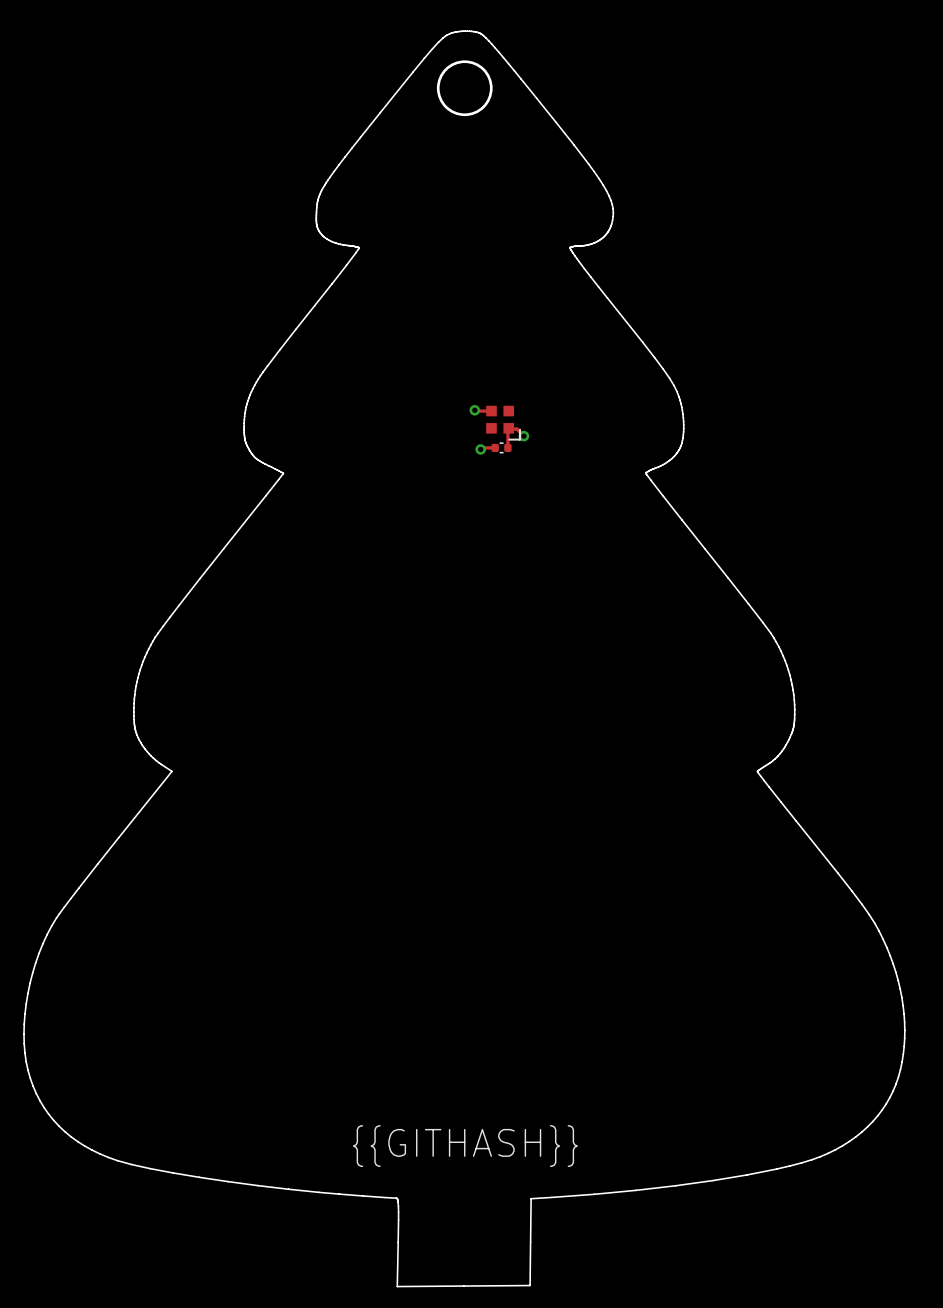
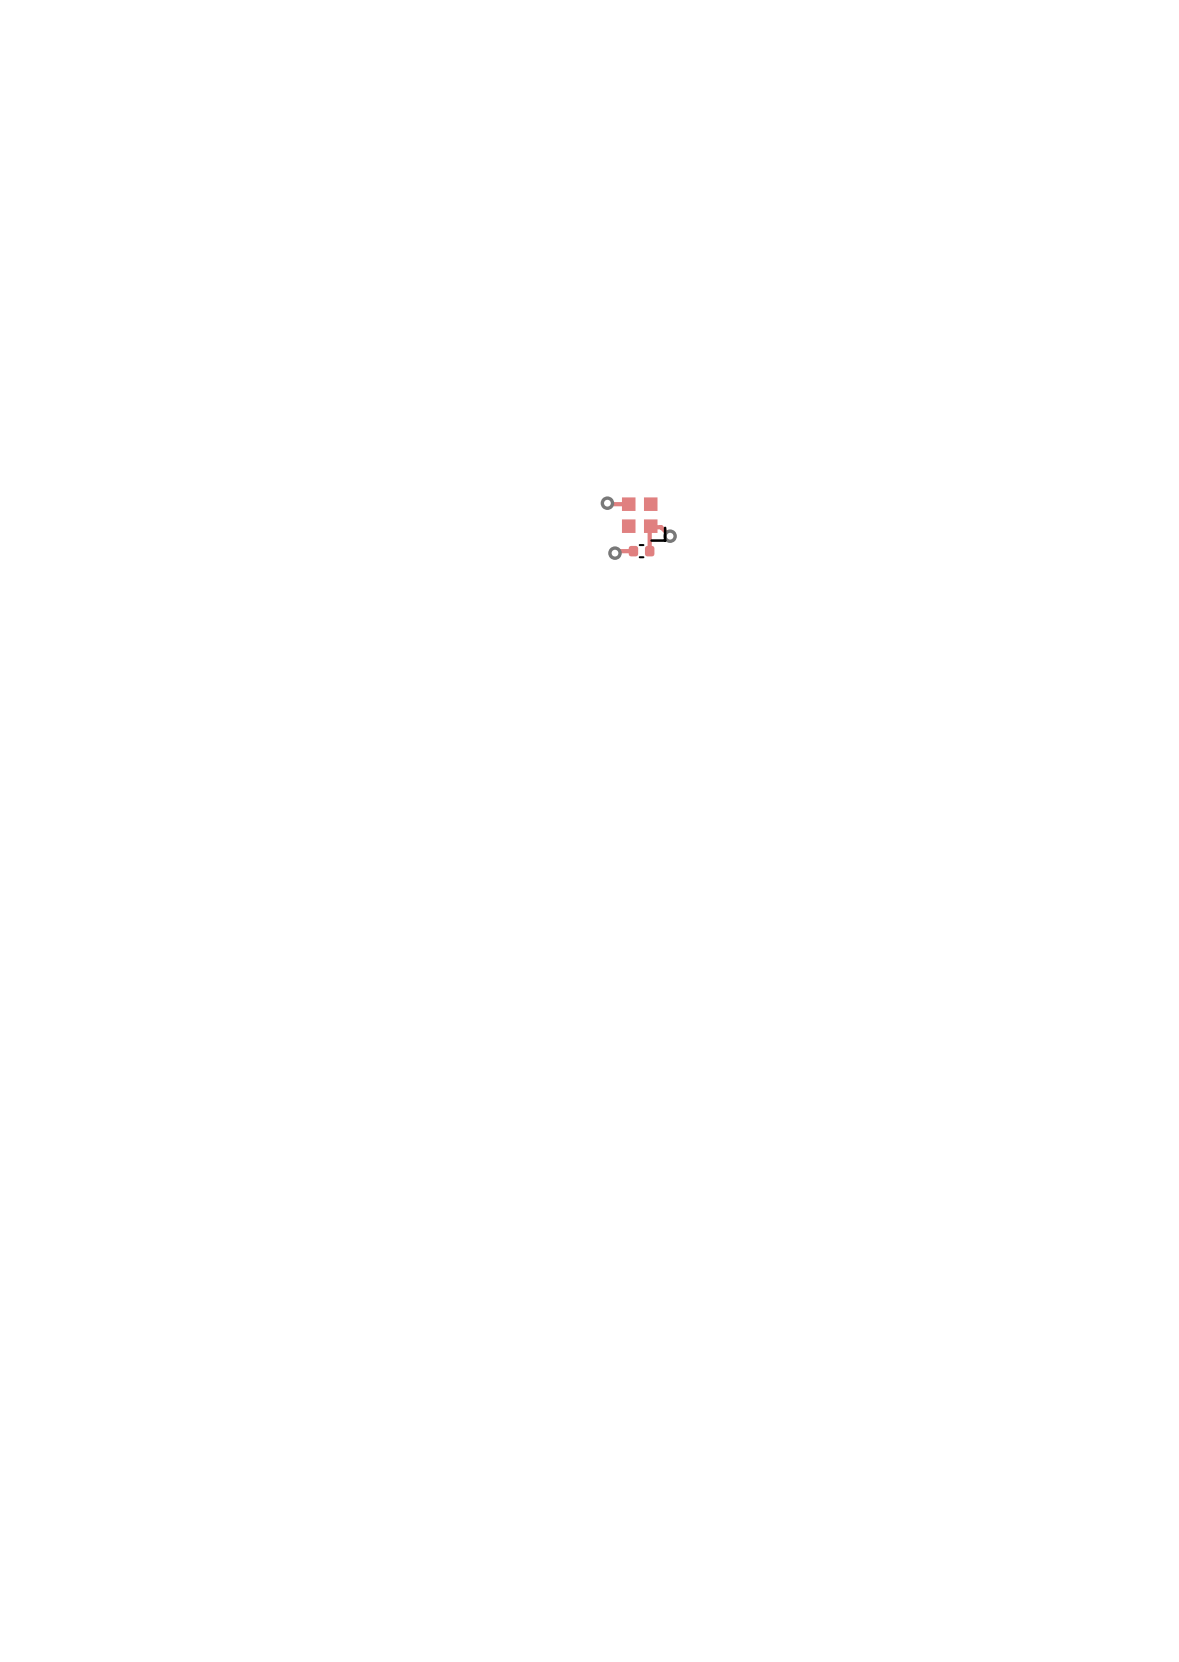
round board edge: [436, 60, 493, 117] -> none
board edge: (358, 247) (332, 241) (319, 231) (316, 224) (316, 213) (321, 191) (345, 156) (432, 48) (446, 35) (465, 31) (480, 33) (495, 47) (574, 145) (609, 195) (613, 216) (607, 233) (593, 243) (570, 247) -> none
board edge: (359, 247) (263, 371) (247, 400) (244, 426) (247, 446) (257, 459) (283, 473) -> none
board edge: (570, 247) (663, 369) (679, 397) (683, 421) (680, 446) (670, 460) (646, 473) -> none
board edge: (283, 473) (170, 616) (148, 649) (136, 686) (133, 707) (135, 728) (139, 740) (146, 751) (171, 771) (56, 917) (42, 943) (32, 973) (26, 1003) (23, 1034) (26, 1061) (30, 1078) (36, 1093) (48, 1114) (64, 1131) (84, 1146) (117, 1160) (173, 1172) (288, 1189) (396, 1198) (398, 1212) (397, 1286) (530, 1285) (531, 1198) (635, 1190) (713, 1180) (790, 1165) (811, 1159) (835, 1149) (855, 1136) (872, 1121) (886, 1103) (896, 1083) (902, 1061) (904, 1038) (904, 1013) (900, 989) (886, 947) (869, 914) (757, 771) -> none
board edge: (646, 473) (763, 623) (776, 642) (785, 660) (793, 694) (793, 728) (779, 754) (757, 771) -> none
text: {{GITHASH}} (465, 1146) -> none

